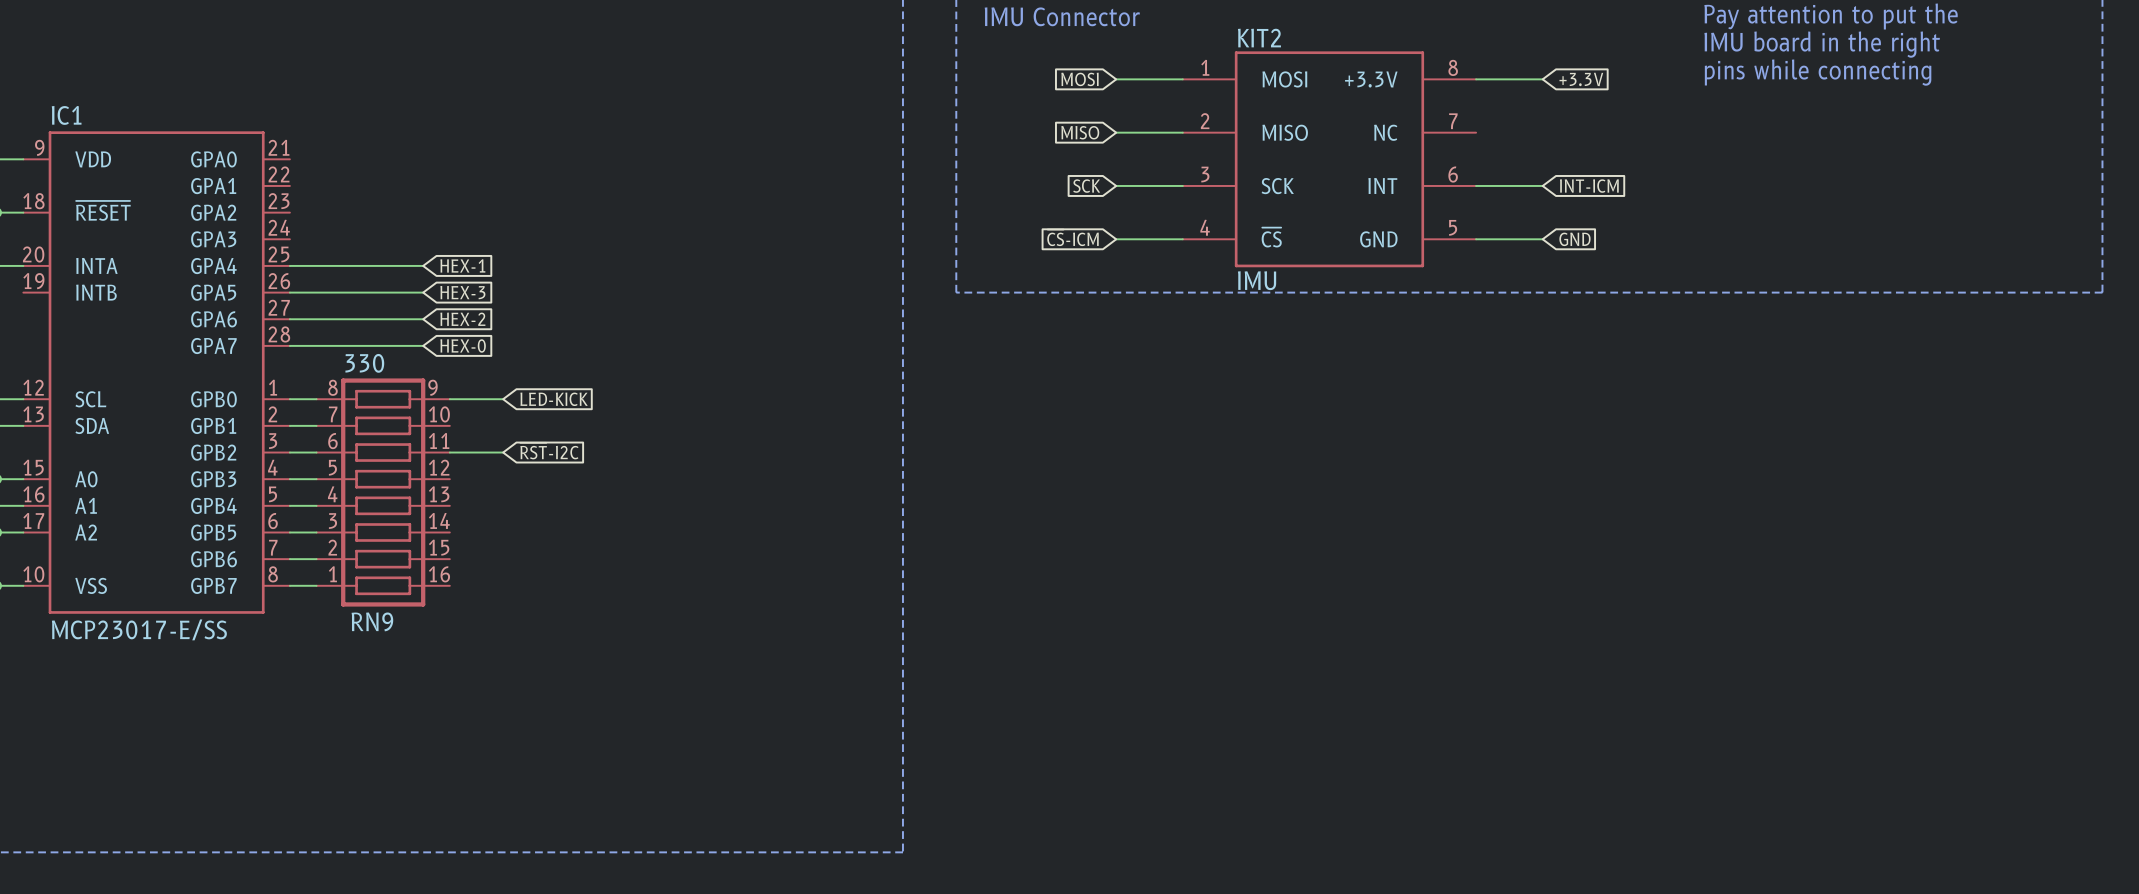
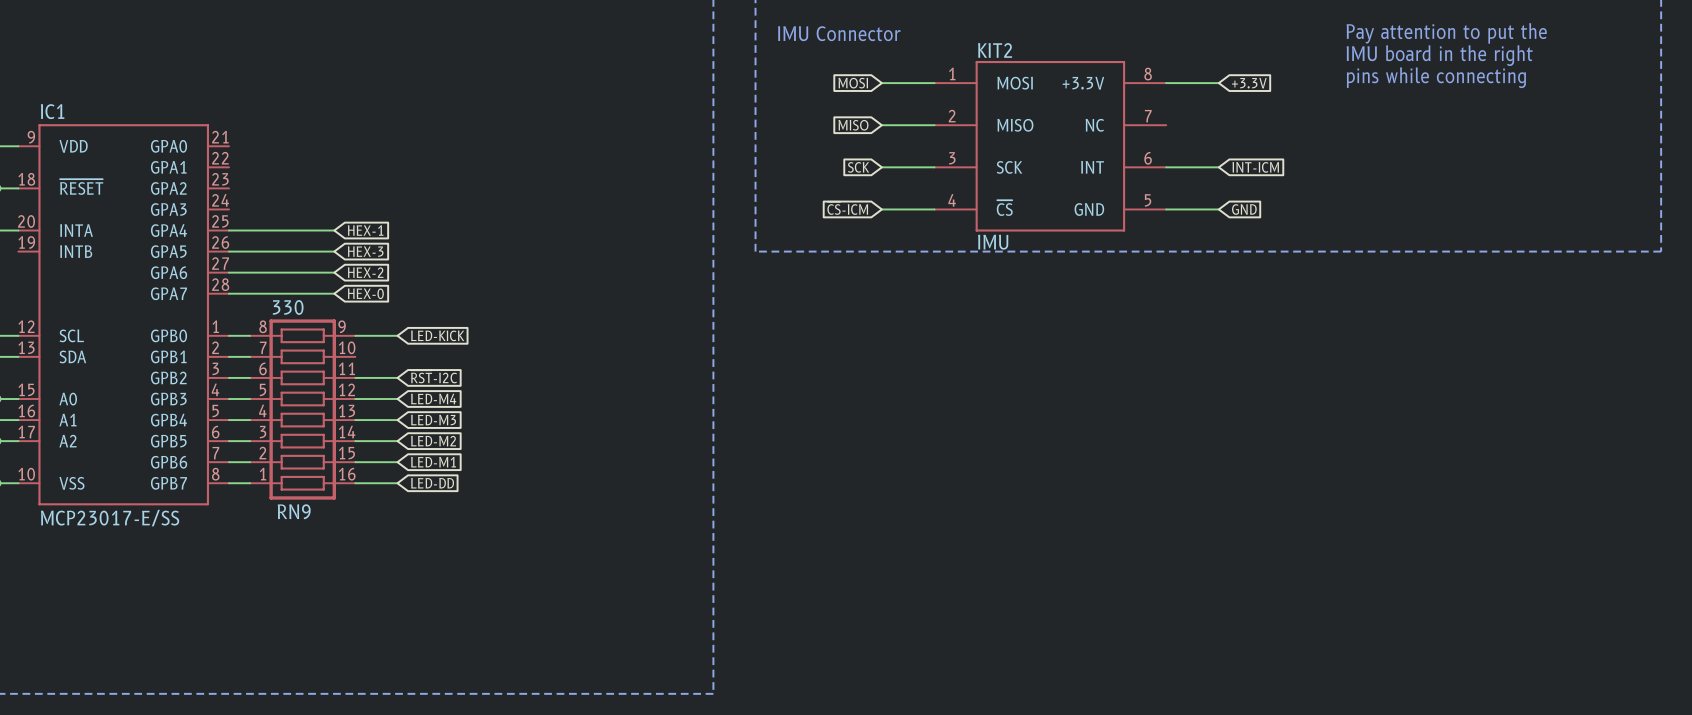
wire: none -> (355, 399) (397, 399)
global label: none -> LED-M4 (433, 399)
wire: none -> (355, 420) (397, 420)
global label: none -> LED-M3 (433, 420)
wire: none -> (355, 441) (397, 441)
global label: none -> LED-M2 (433, 441)
wire: none -> (355, 462) (397, 462)
global label: none -> LED-M1 (433, 462)
wire: none -> (355, 483) (397, 483)
global label: none -> LED-DD (432, 483)

